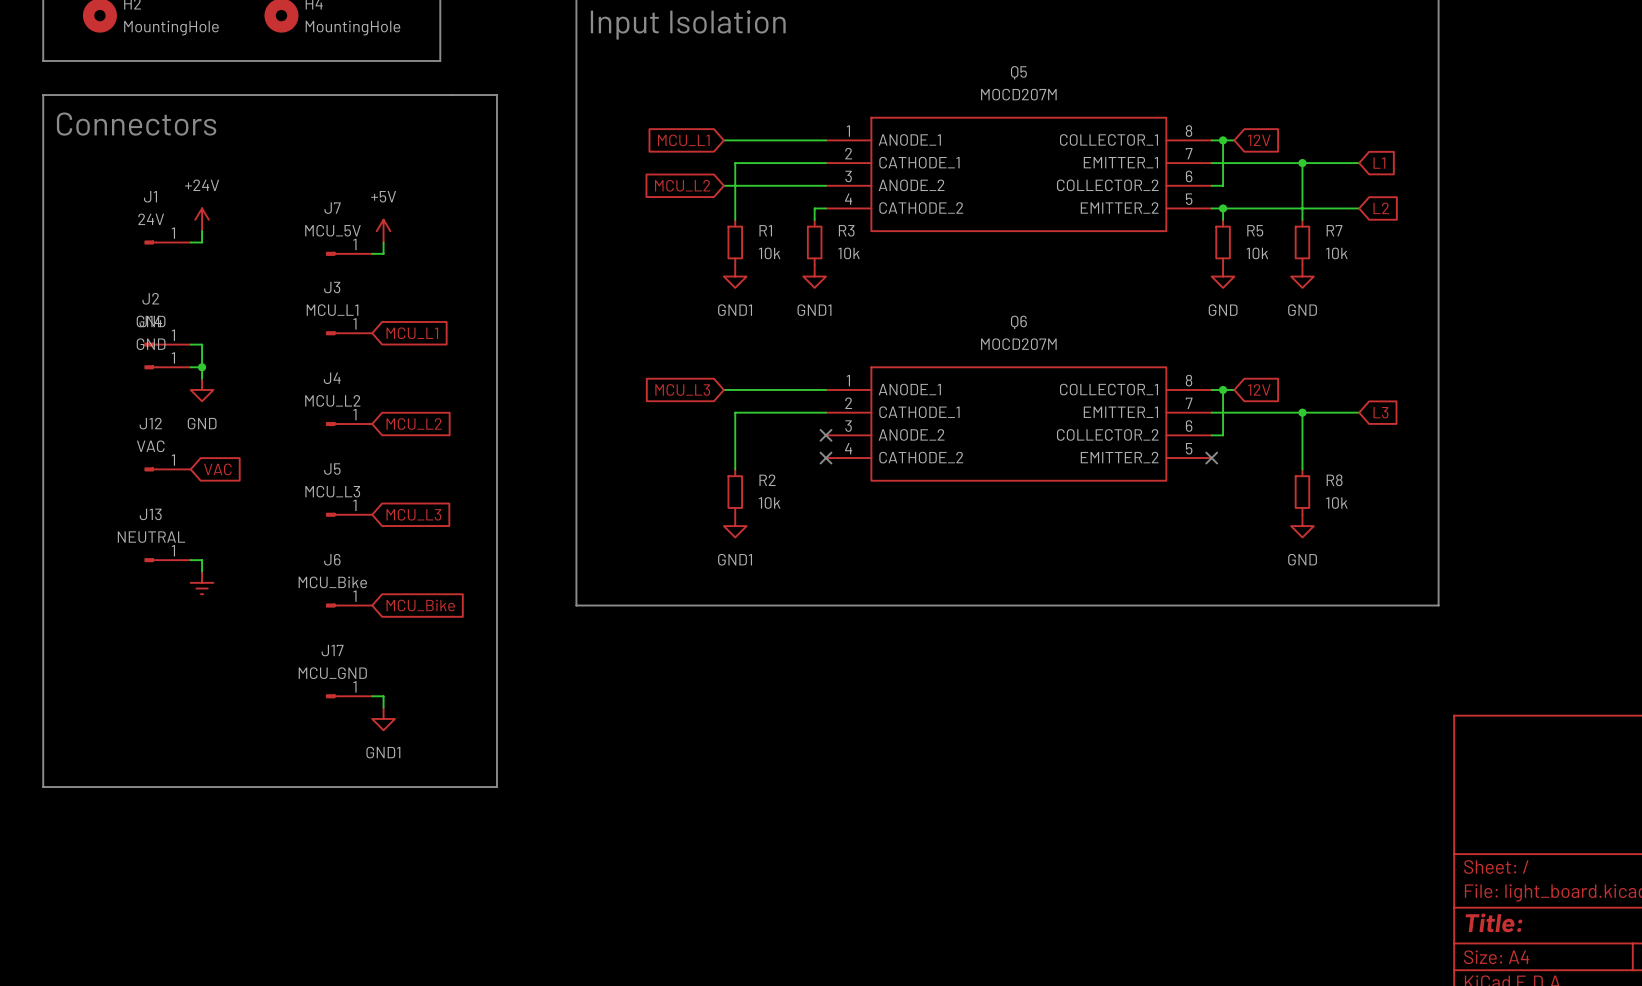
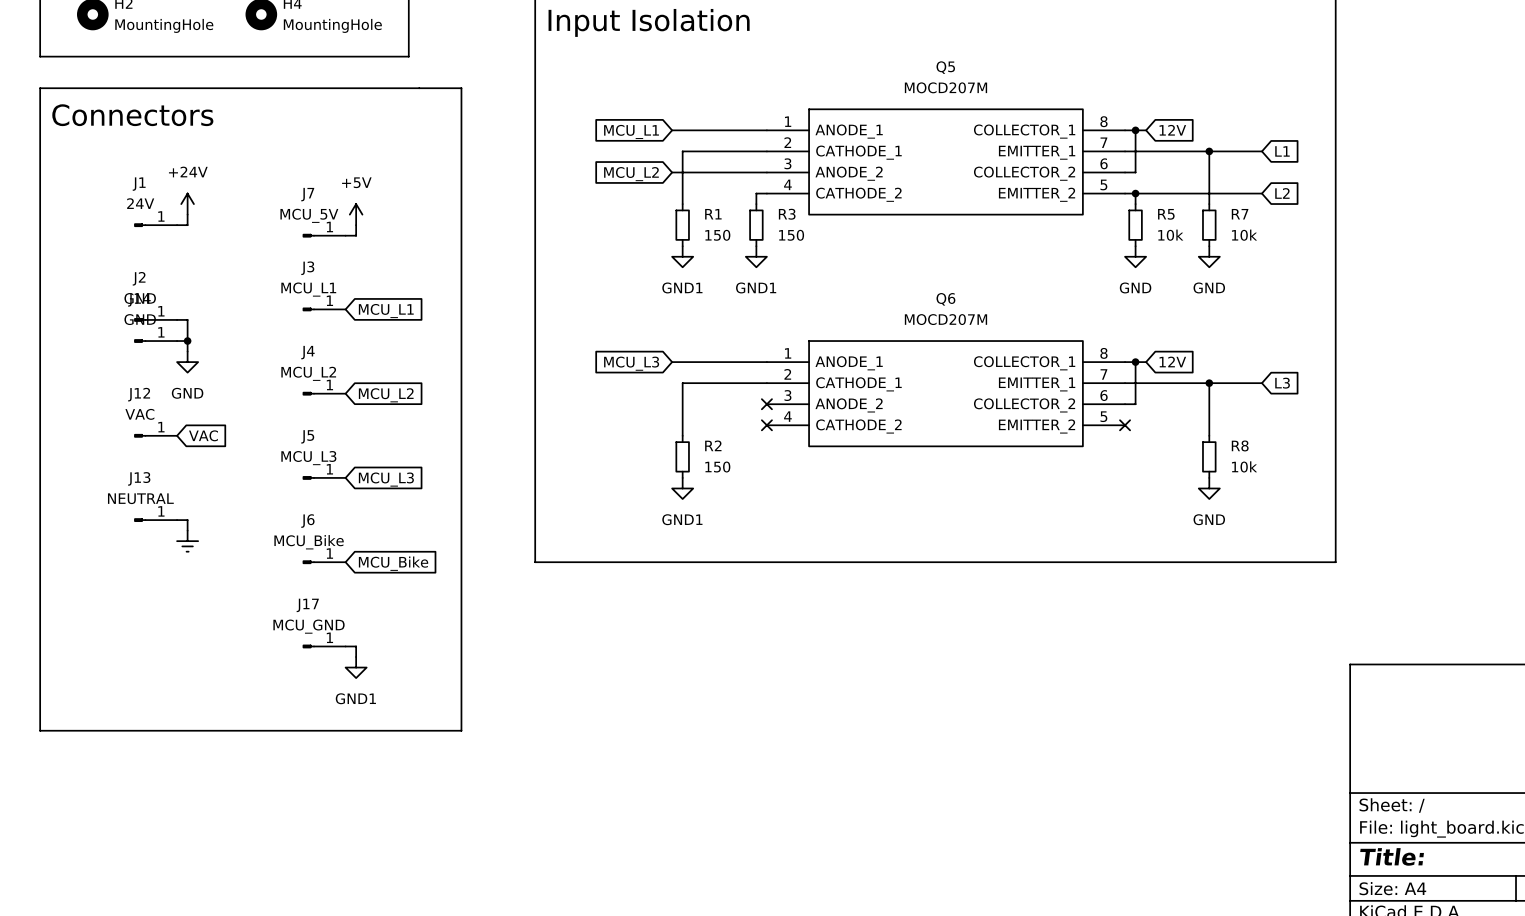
R1 value: 10k (769, 253) -> 150 (717, 235)
R3 value: 10k (849, 253) -> 150 (791, 235)
R2 value: 10k (769, 503) -> 150 (717, 467)

